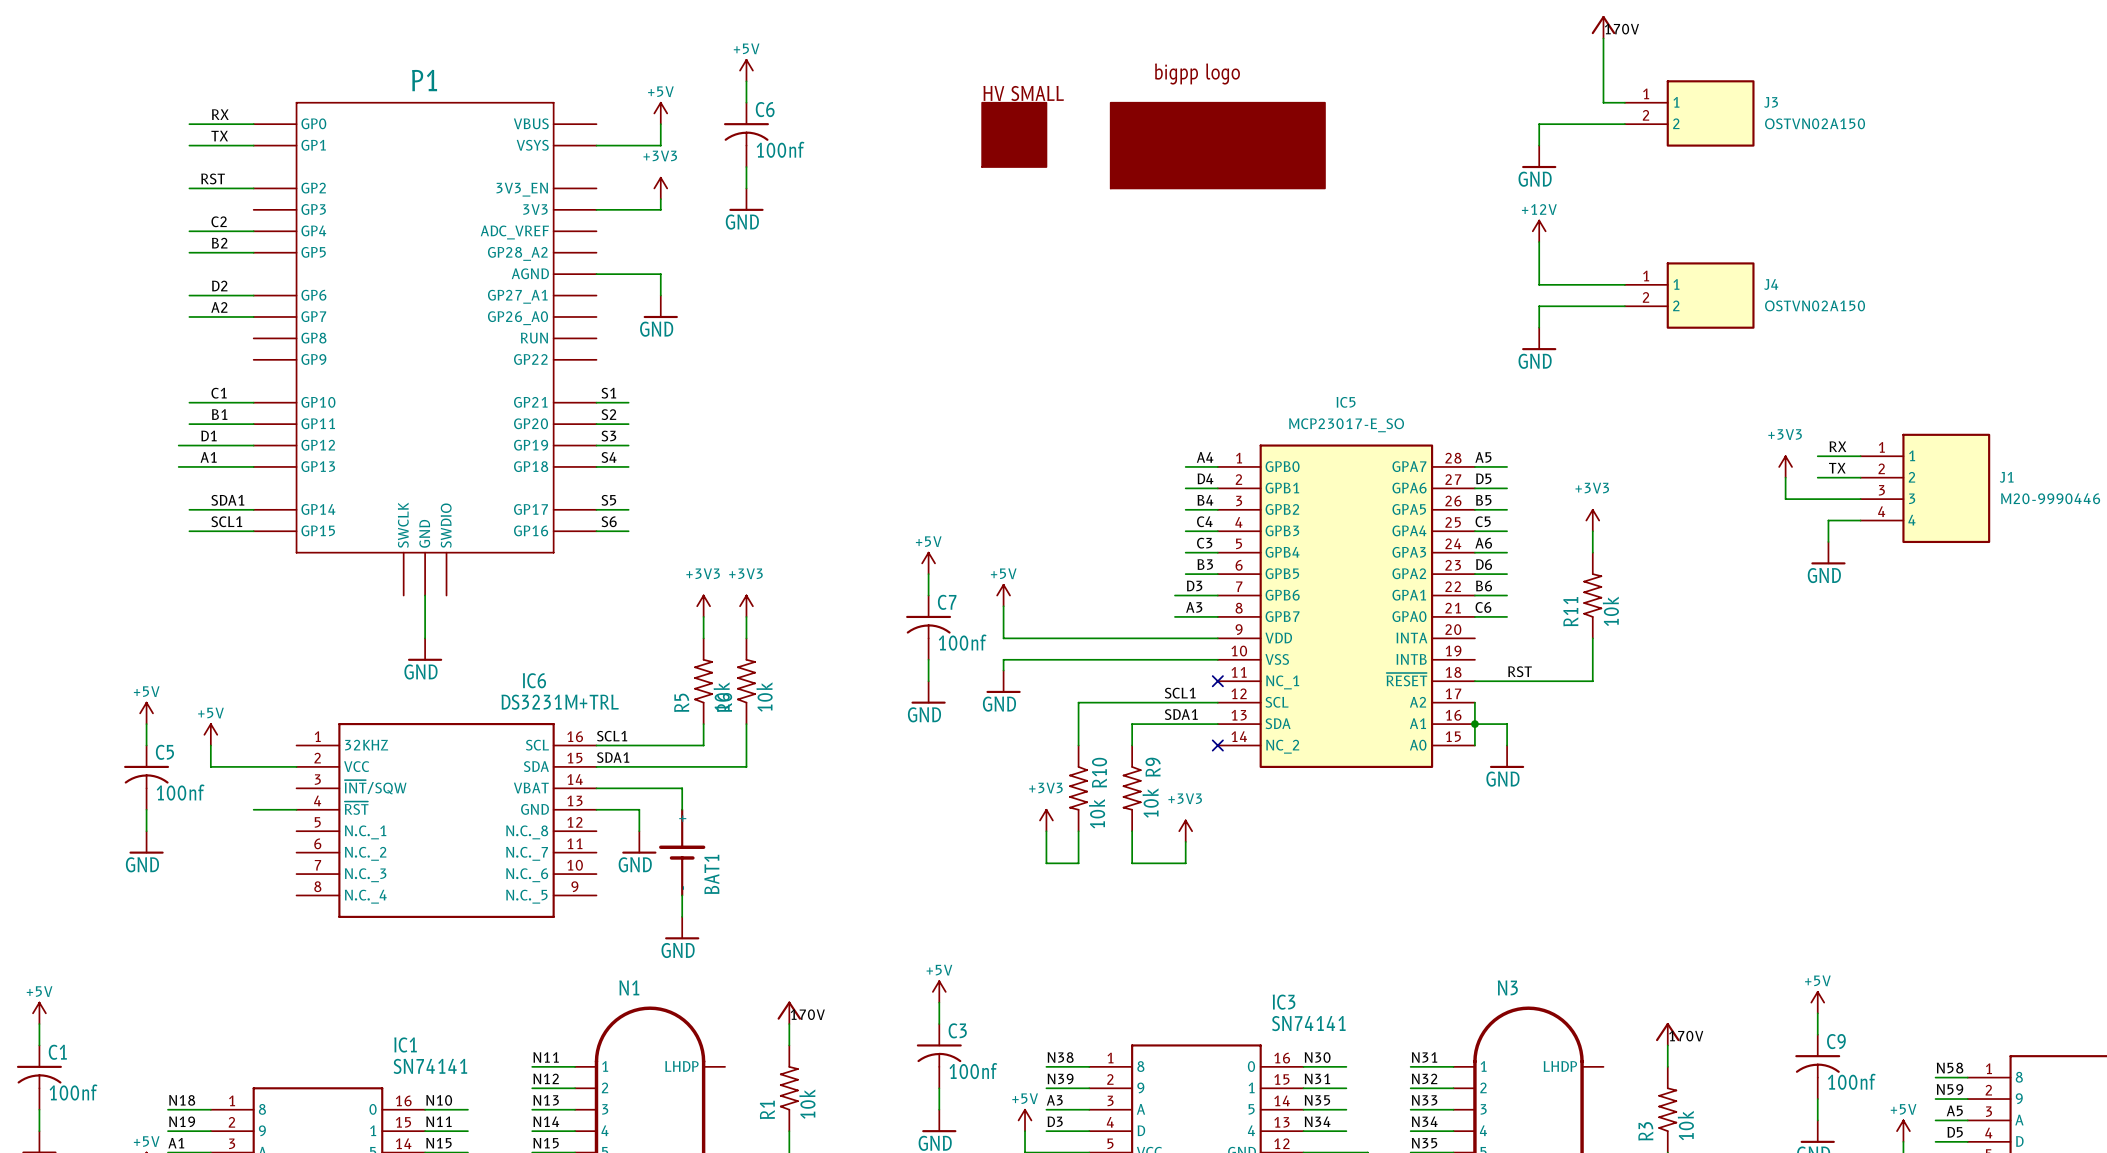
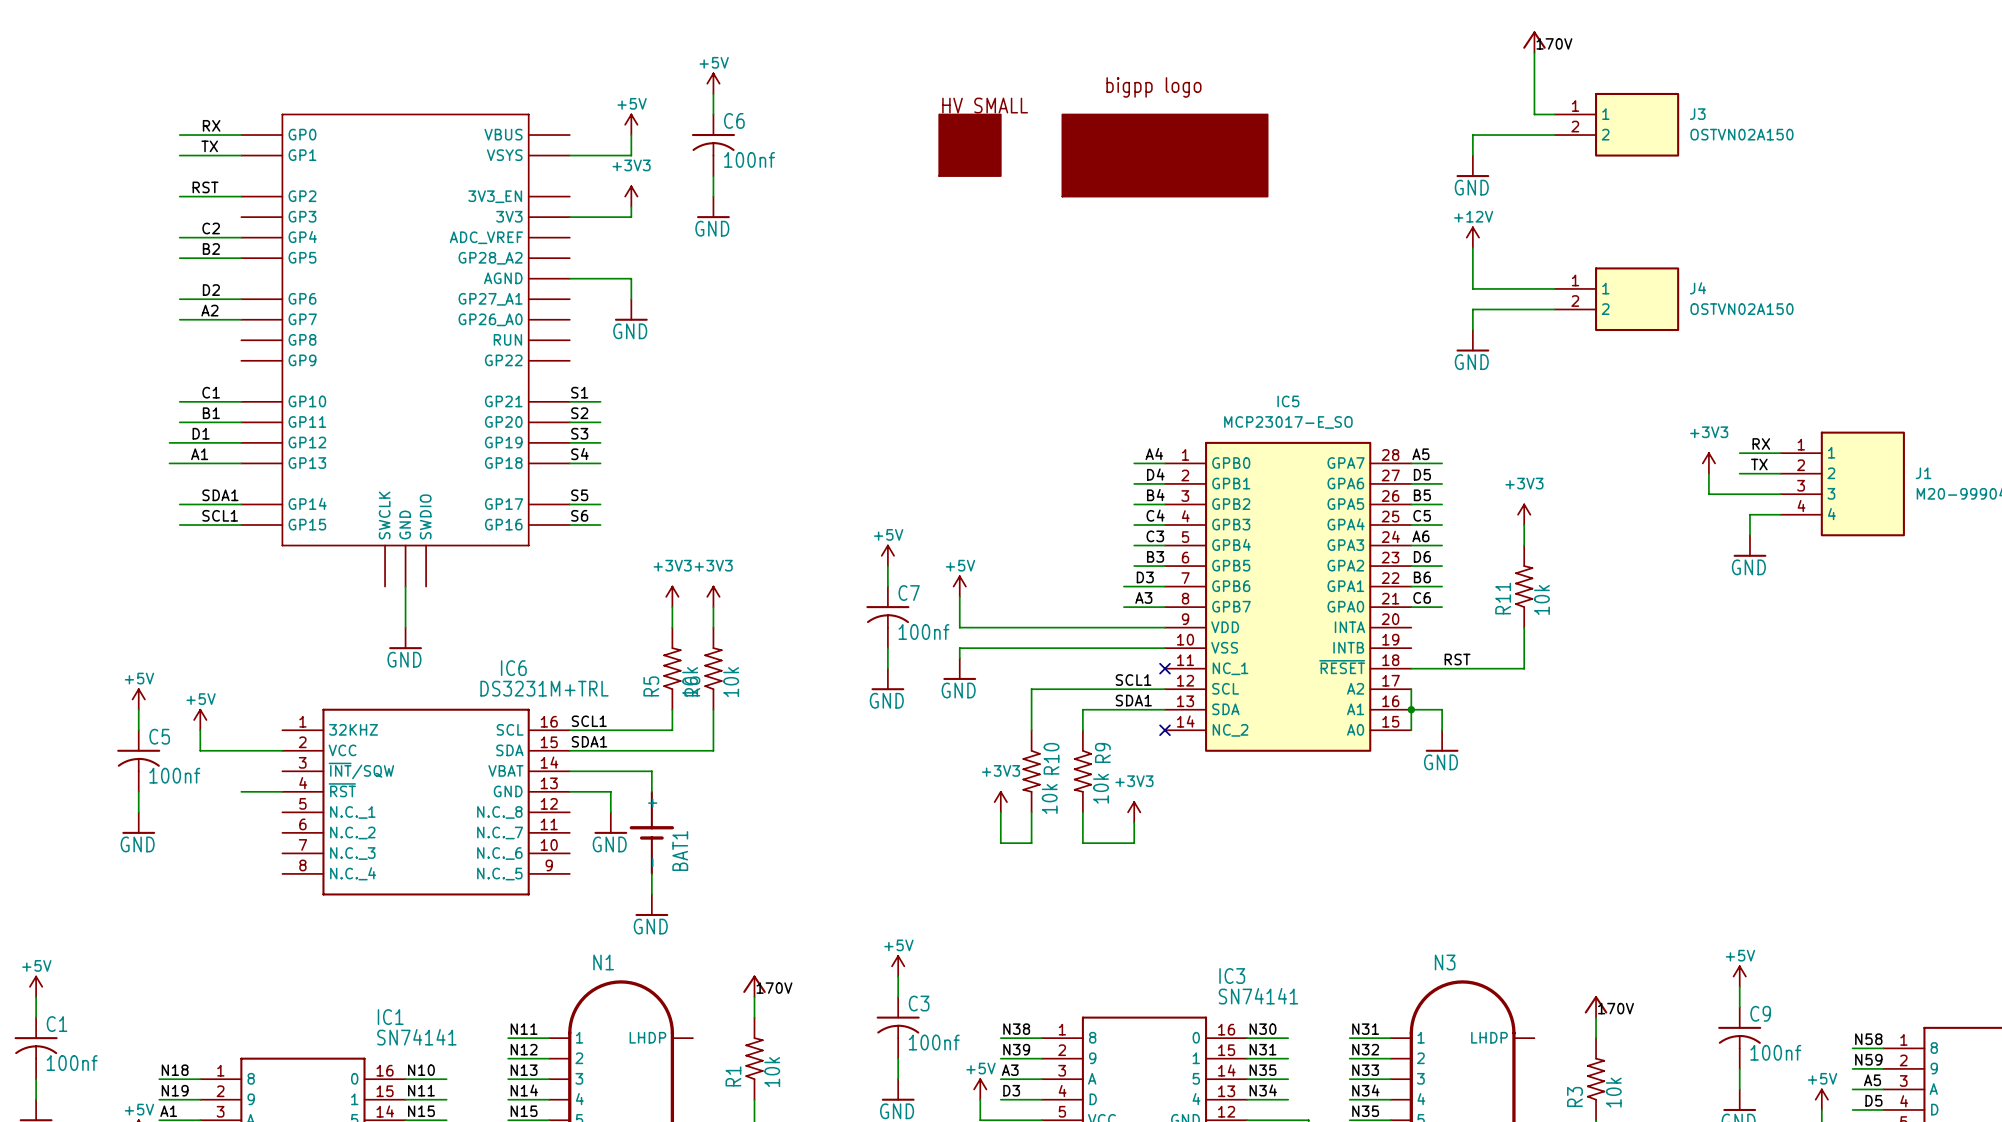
P1 name: P1 (424, 80) -> none

